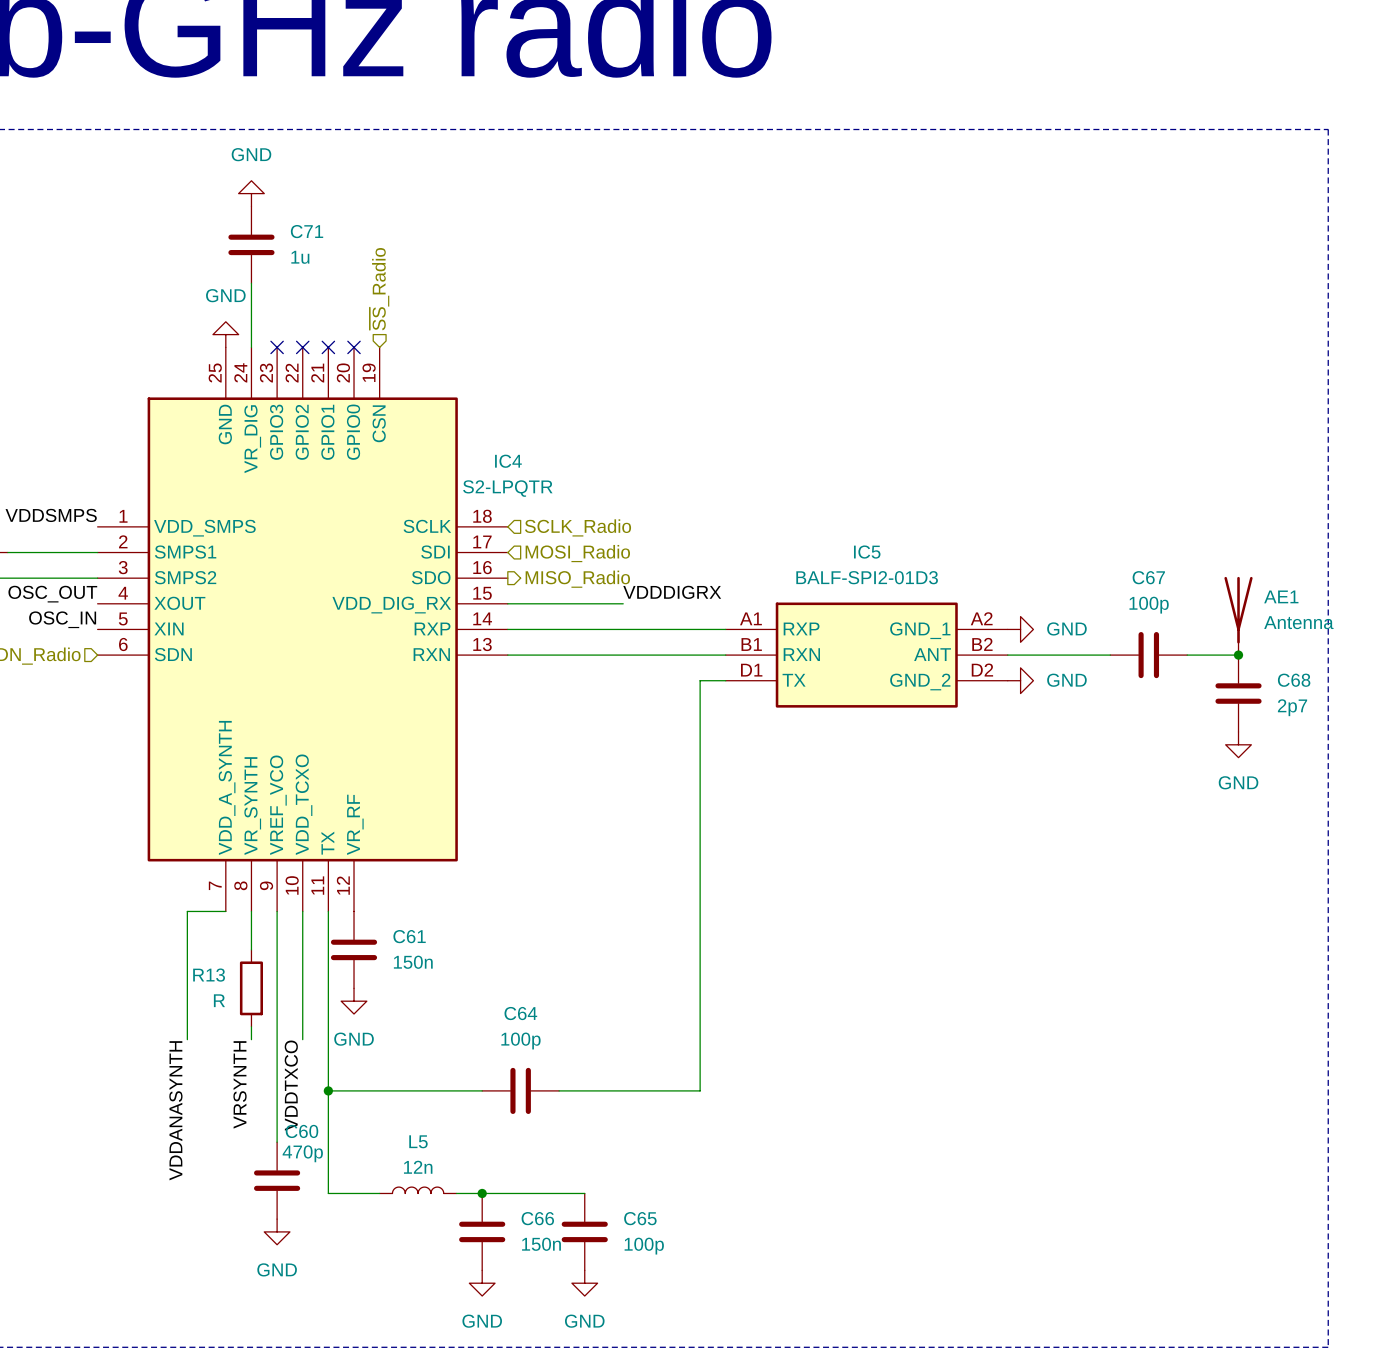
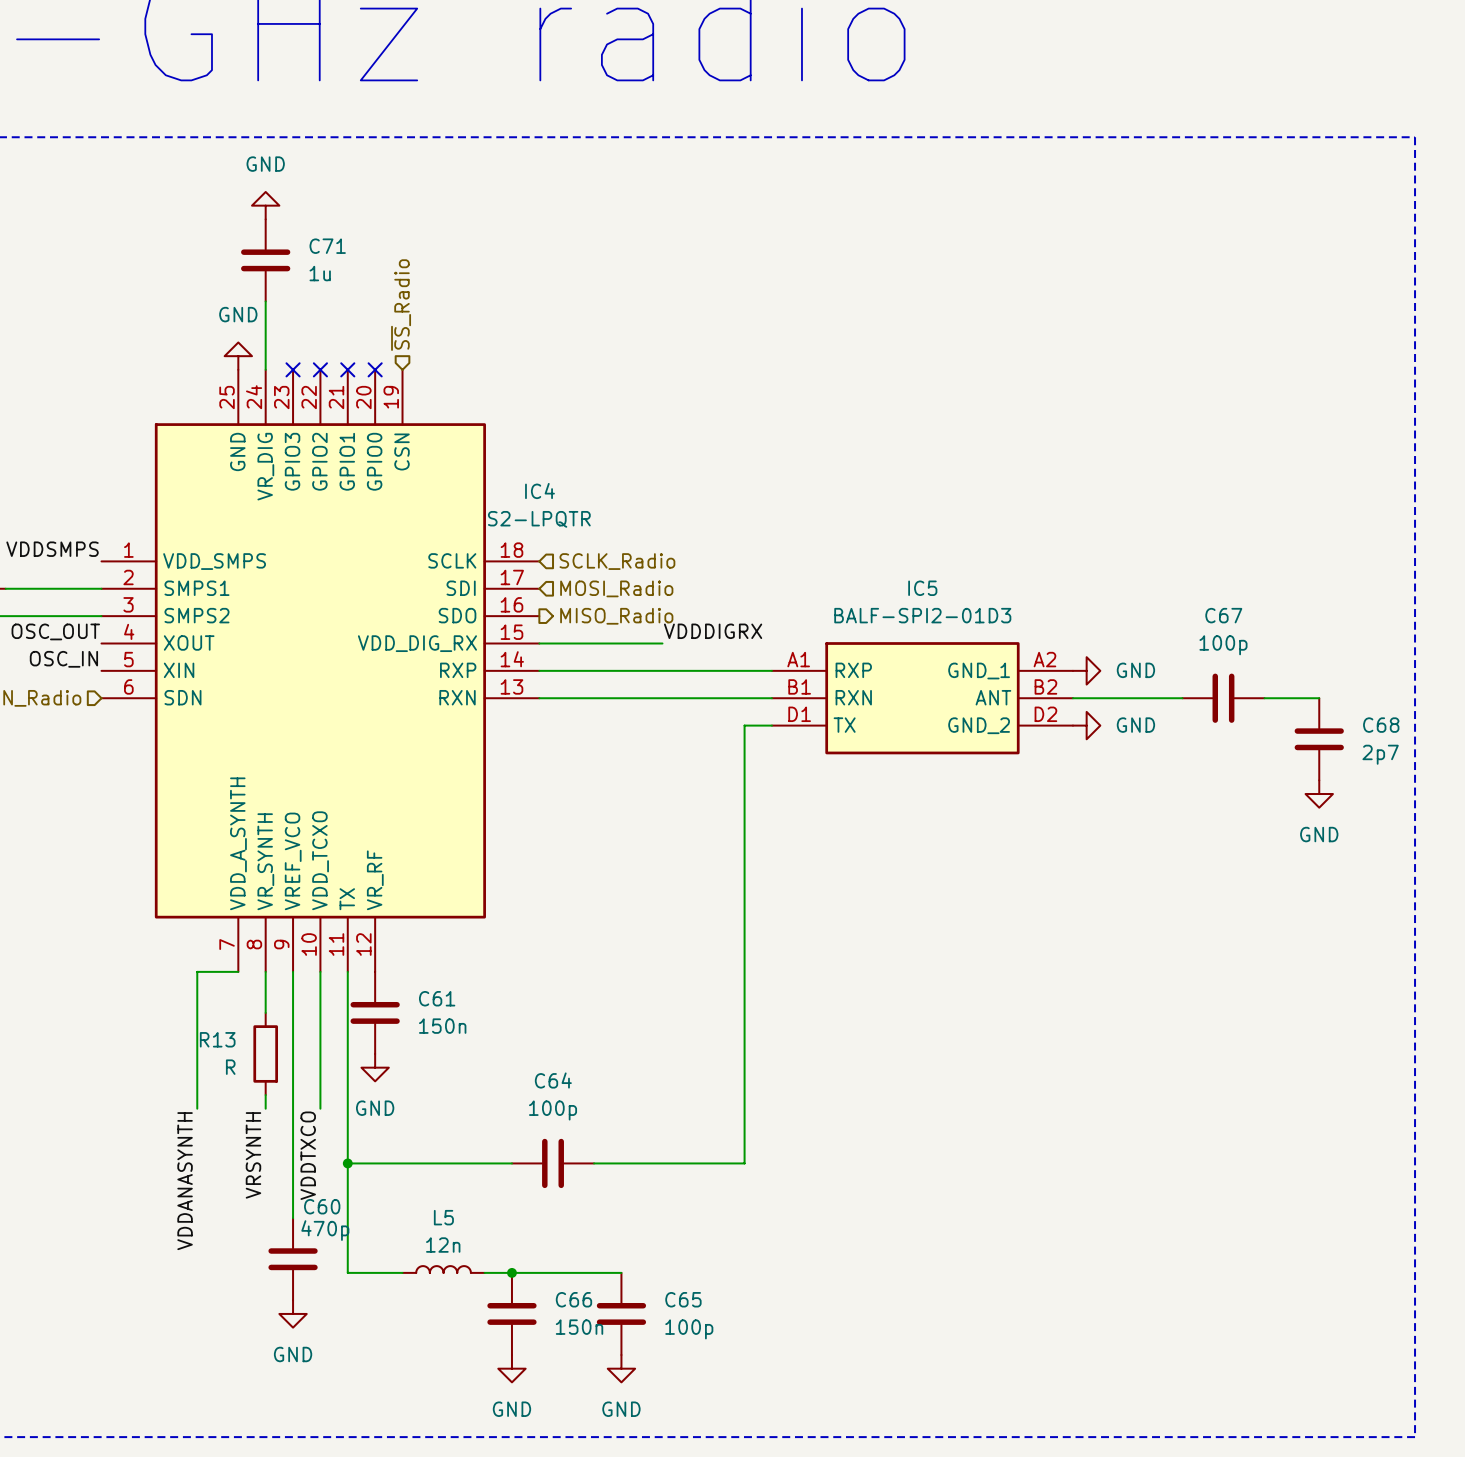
AE1: Antenna (1238, 615) -> none
junction: (1238, 655) -> none

